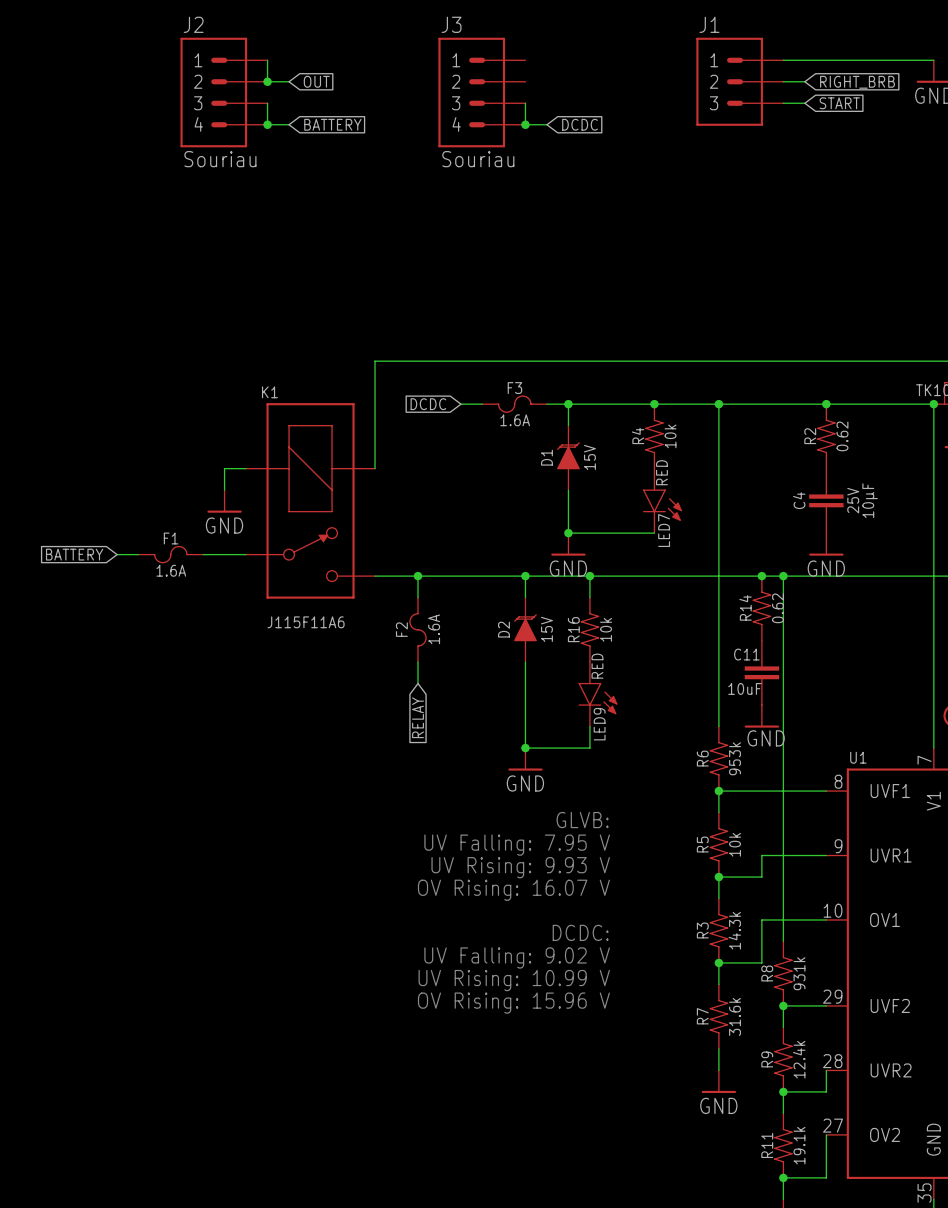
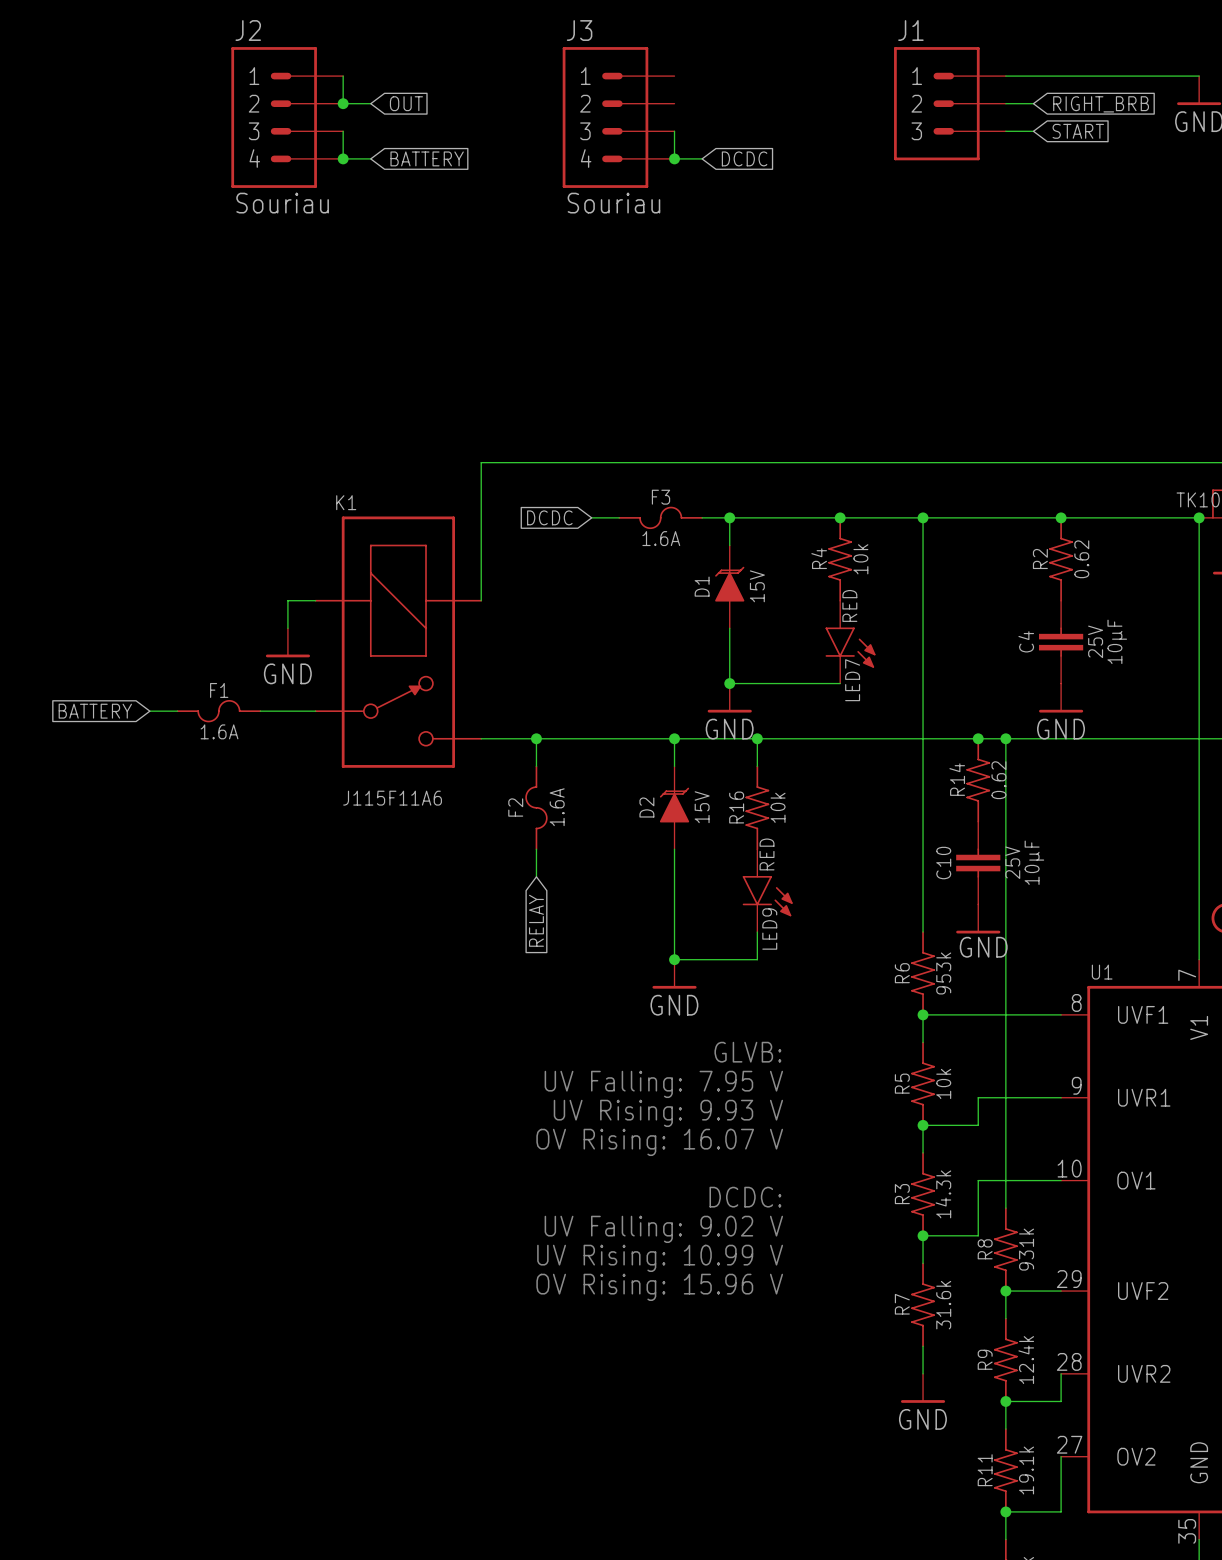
C11 name: C11 (746, 654) -> C10 (943, 863)
C11 text: none -> 25V (1012, 862)
C11 text: none -> 10µF (1034, 862)
C11 value: 10uF (744, 688) -> none

